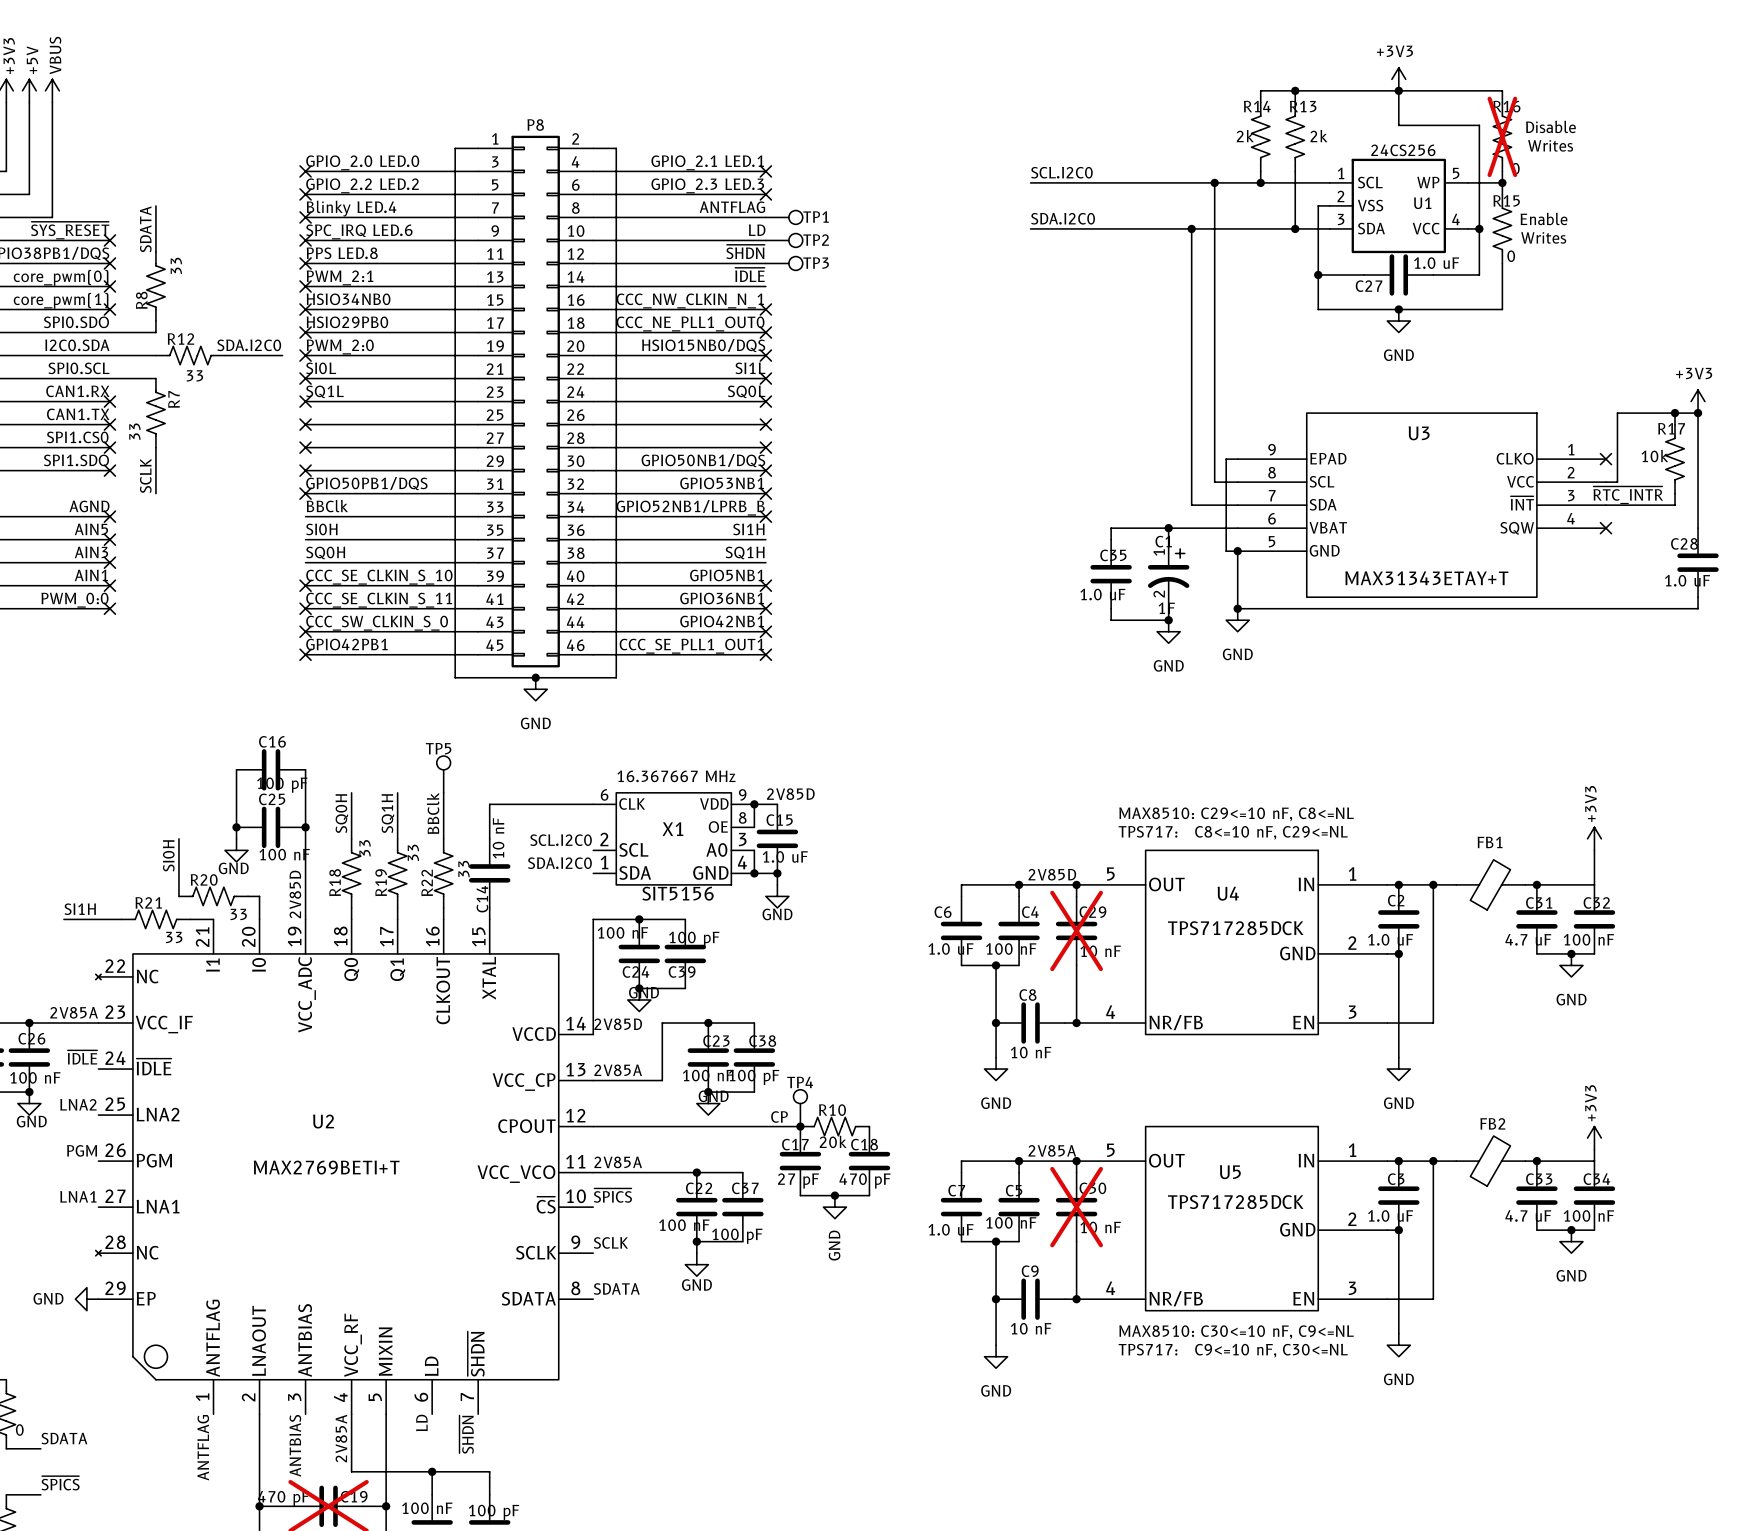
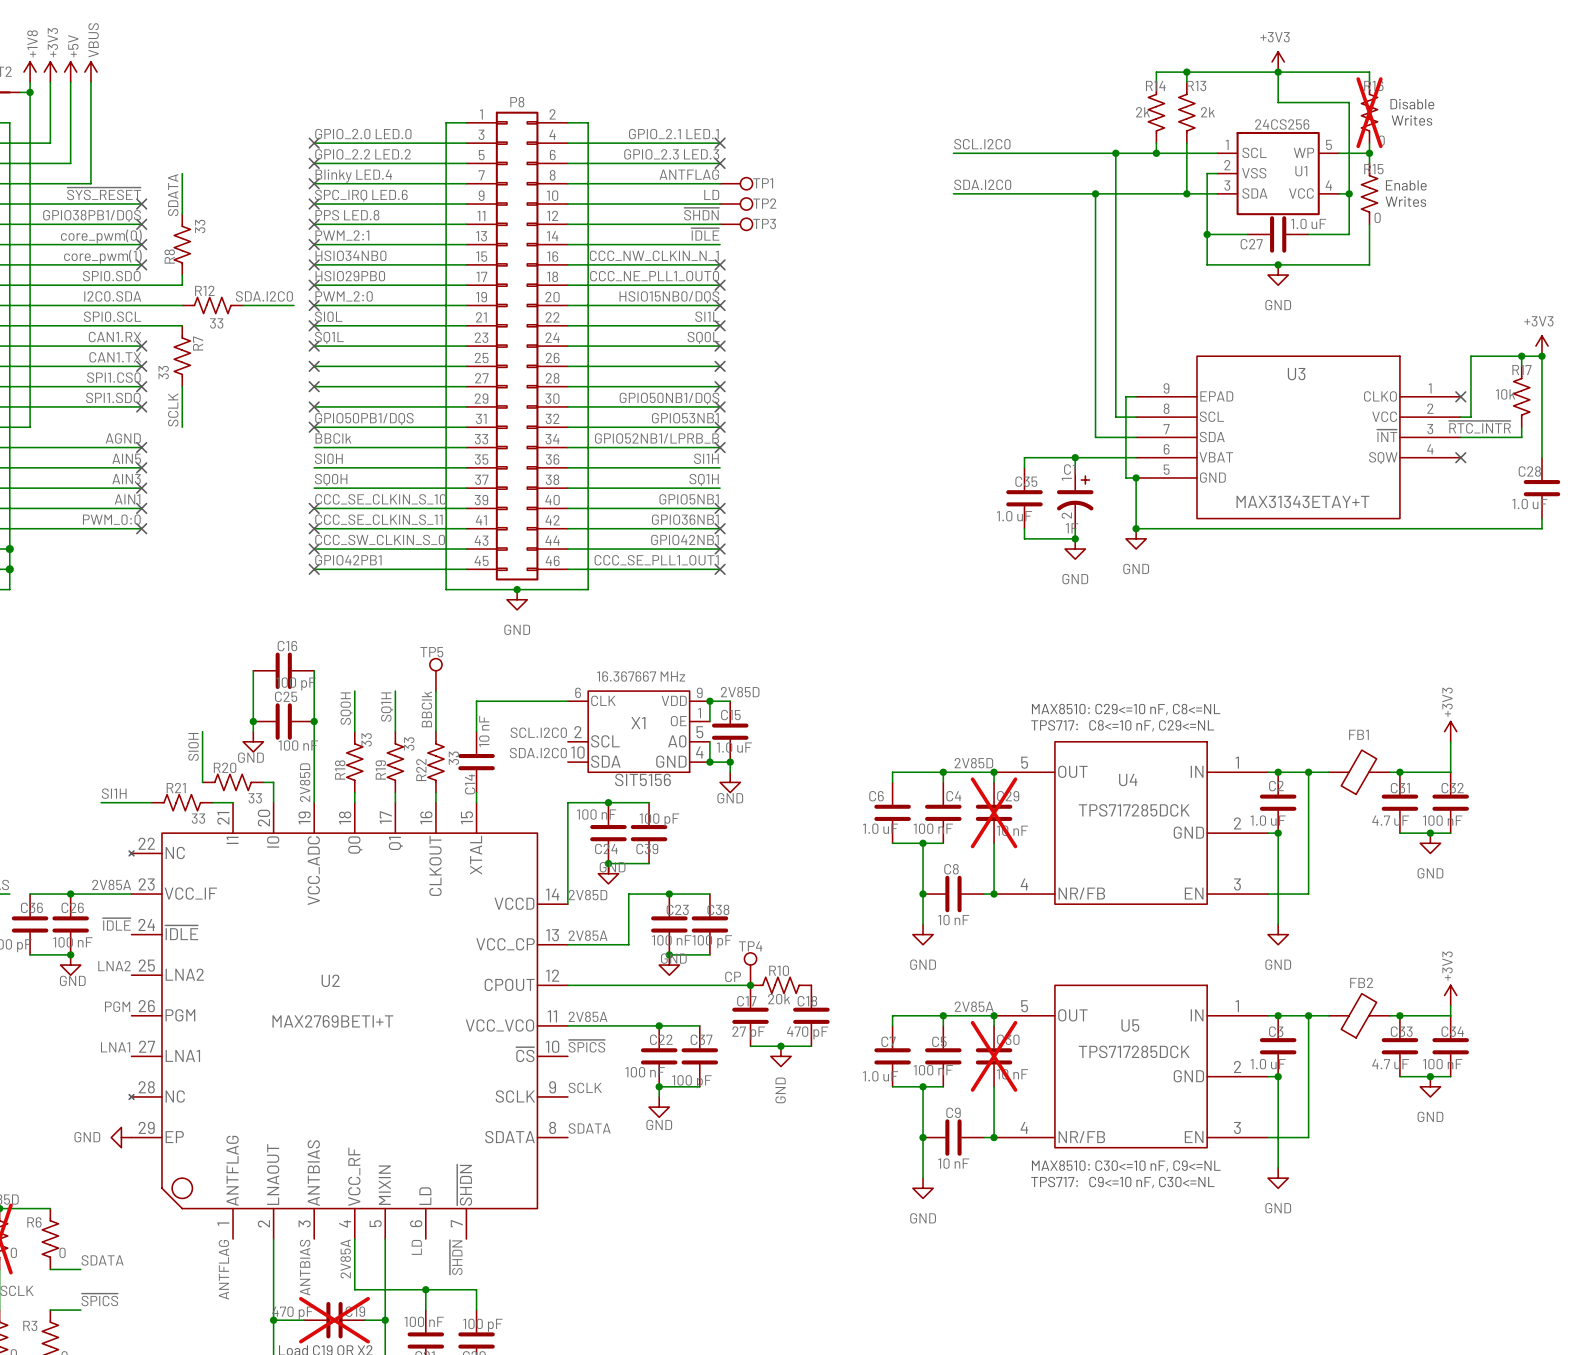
X1 pin number: 8 (742, 817) -> 1 (699, 713)
X1 pin number: 3 (742, 839) -> 5 (699, 732)
X1 pin number: 1 (604, 862) -> 10 (577, 752)

